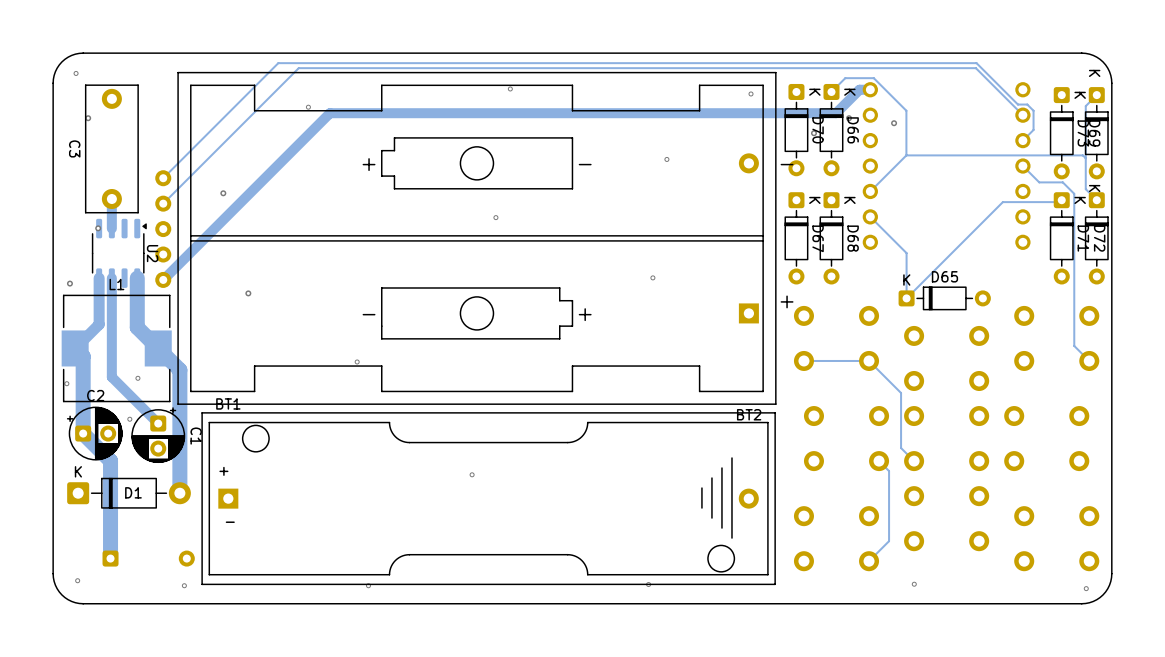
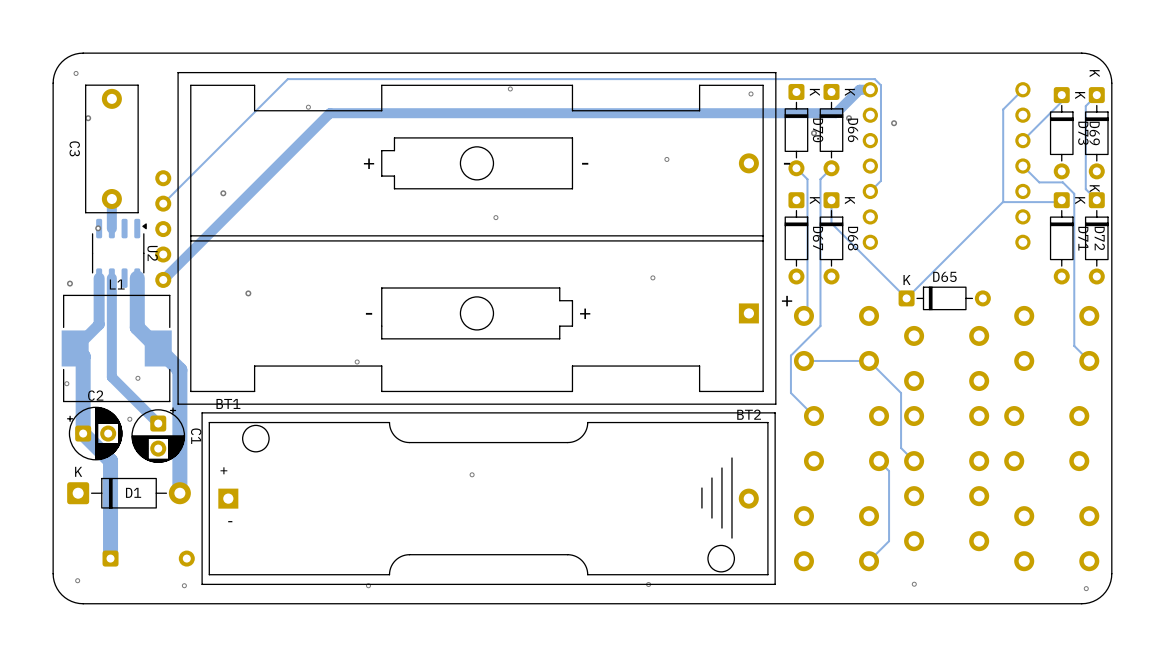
track: (287, 79) (298, 68) (975, 68) (1022, 115) -> (287, 79) (874, 79)
track: (874, 79) (845, 78) (831, 91) -> none
track: (880, 85) (906, 110) (906, 155) -> (880, 85) (880, 180)
track: none -> (1022, 89) (1003, 109) (1003, 202)
track: (1033, 129) (1033, 110) (1027, 104) (1017, 104) (976, 63) (278, 63) (163, 178) -> (1033, 129) (1061, 101) (1061, 95)
track: (906, 155) (1082, 155) (1085, 158) -> none
track: (906, 155) (880, 180) -> none
track: none -> (796, 168) (807, 179) (807, 312) (803, 315)
track: none -> (831, 168) (820, 179) (820, 326) (790, 355) (790, 393) (813, 416)
track: (870, 216) (906, 253) (906, 298) -> (831, 200) (831, 223) (906, 298)

